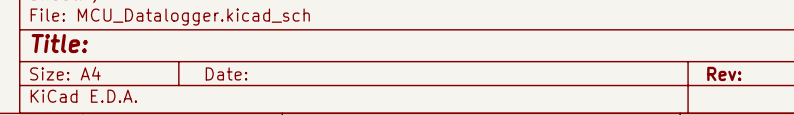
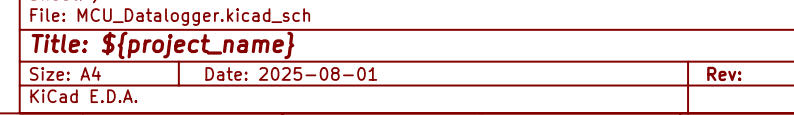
title block: Title: (59, 43) -> Title: ${project_name} (162, 45)
title block: Date: (226, 73) -> Date: 2025-08-01 (291, 73)

